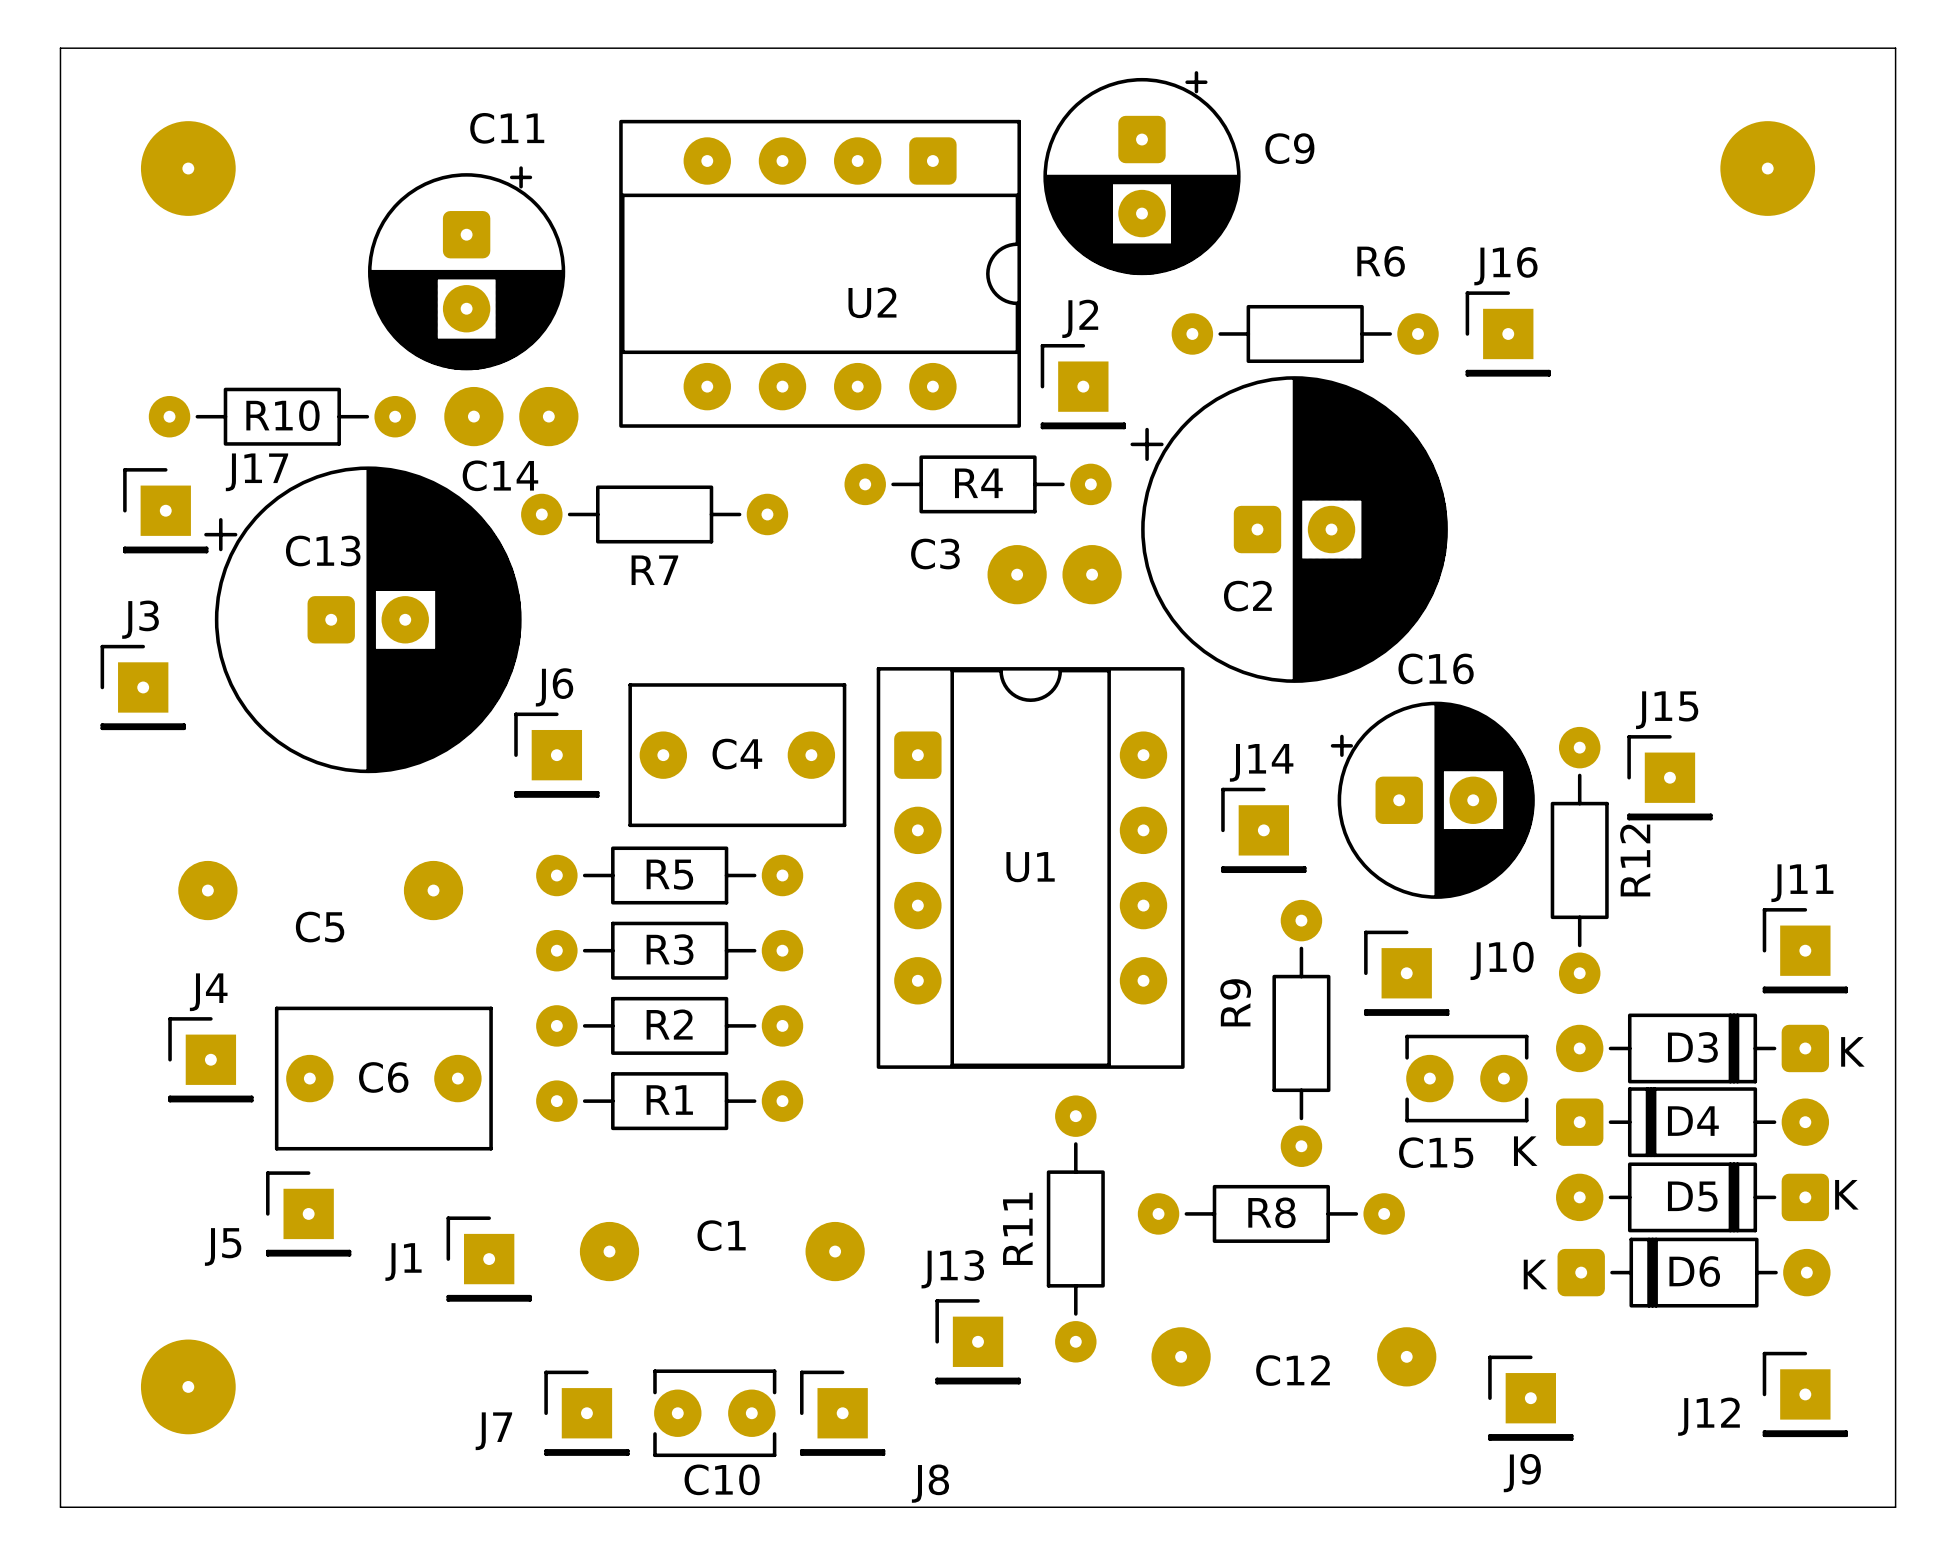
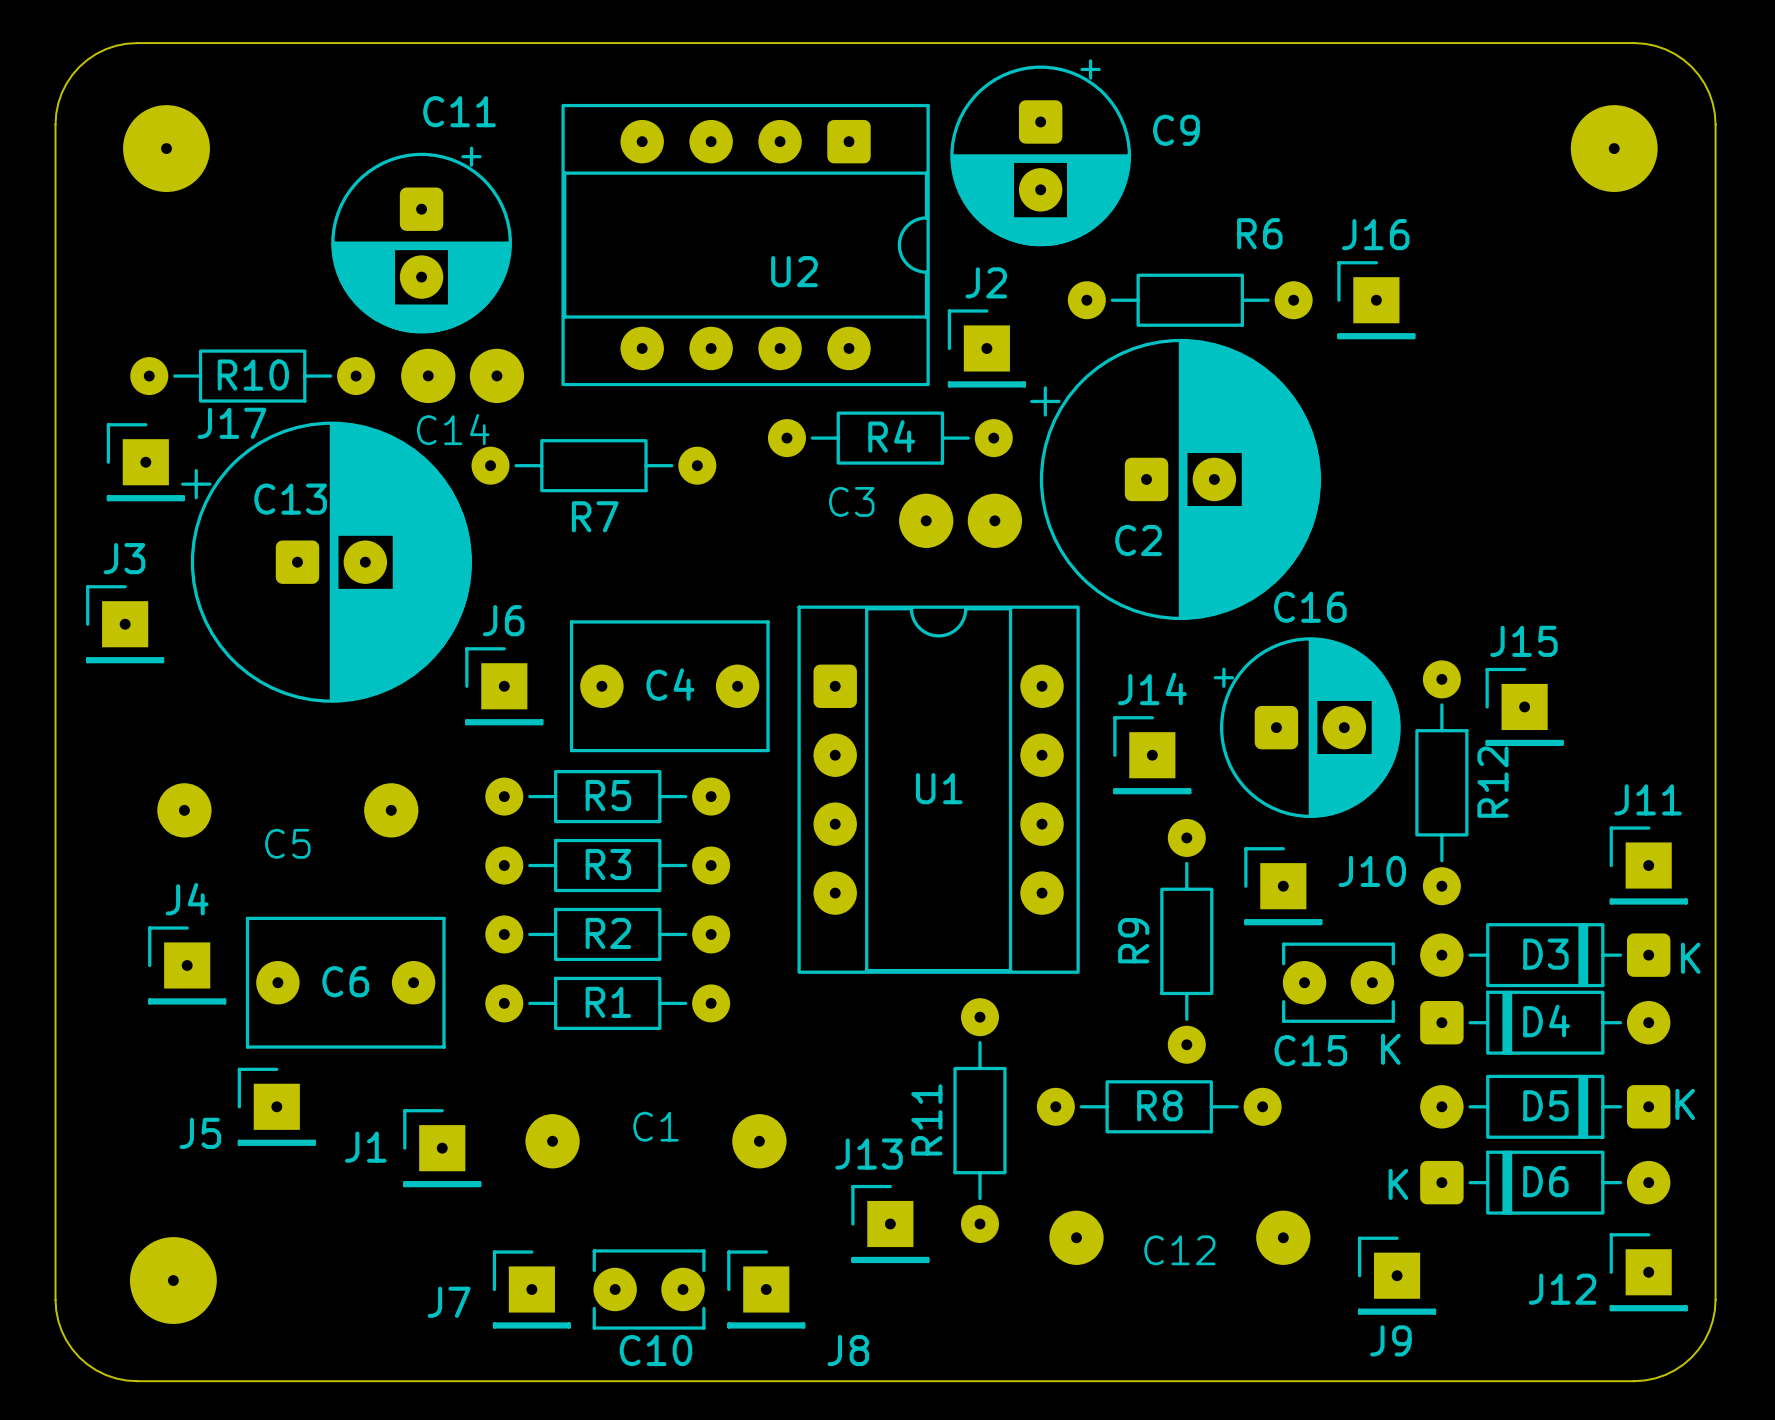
board edge: (60, 48) (1895, 48) (1895, 1507) (60, 1507) (60, 48) -> (136, 43) (105, 49) (79, 66) (61, 93) (55, 124) (55, 1299) (58, 1320) (66, 1340) (87, 1364) (105, 1374) (136, 1381) (1634, 1381) (1655, 1378) (1674, 1370) (1698, 1349) (1709, 1330) (1715, 1299) (1715, 124) (1709, 93) (1698, 74) (1683, 59) (1655, 45) (1634, 43) (136, 43)
R9 name position: R9 (1235, 1002) -> R9 (1133, 940)
D5 position: (1692, 1197) -> (1545, 1106)
D6 position: (1694, 1272) -> (1545, 1182)
part position: (188, 1386) -> (173, 1280)

